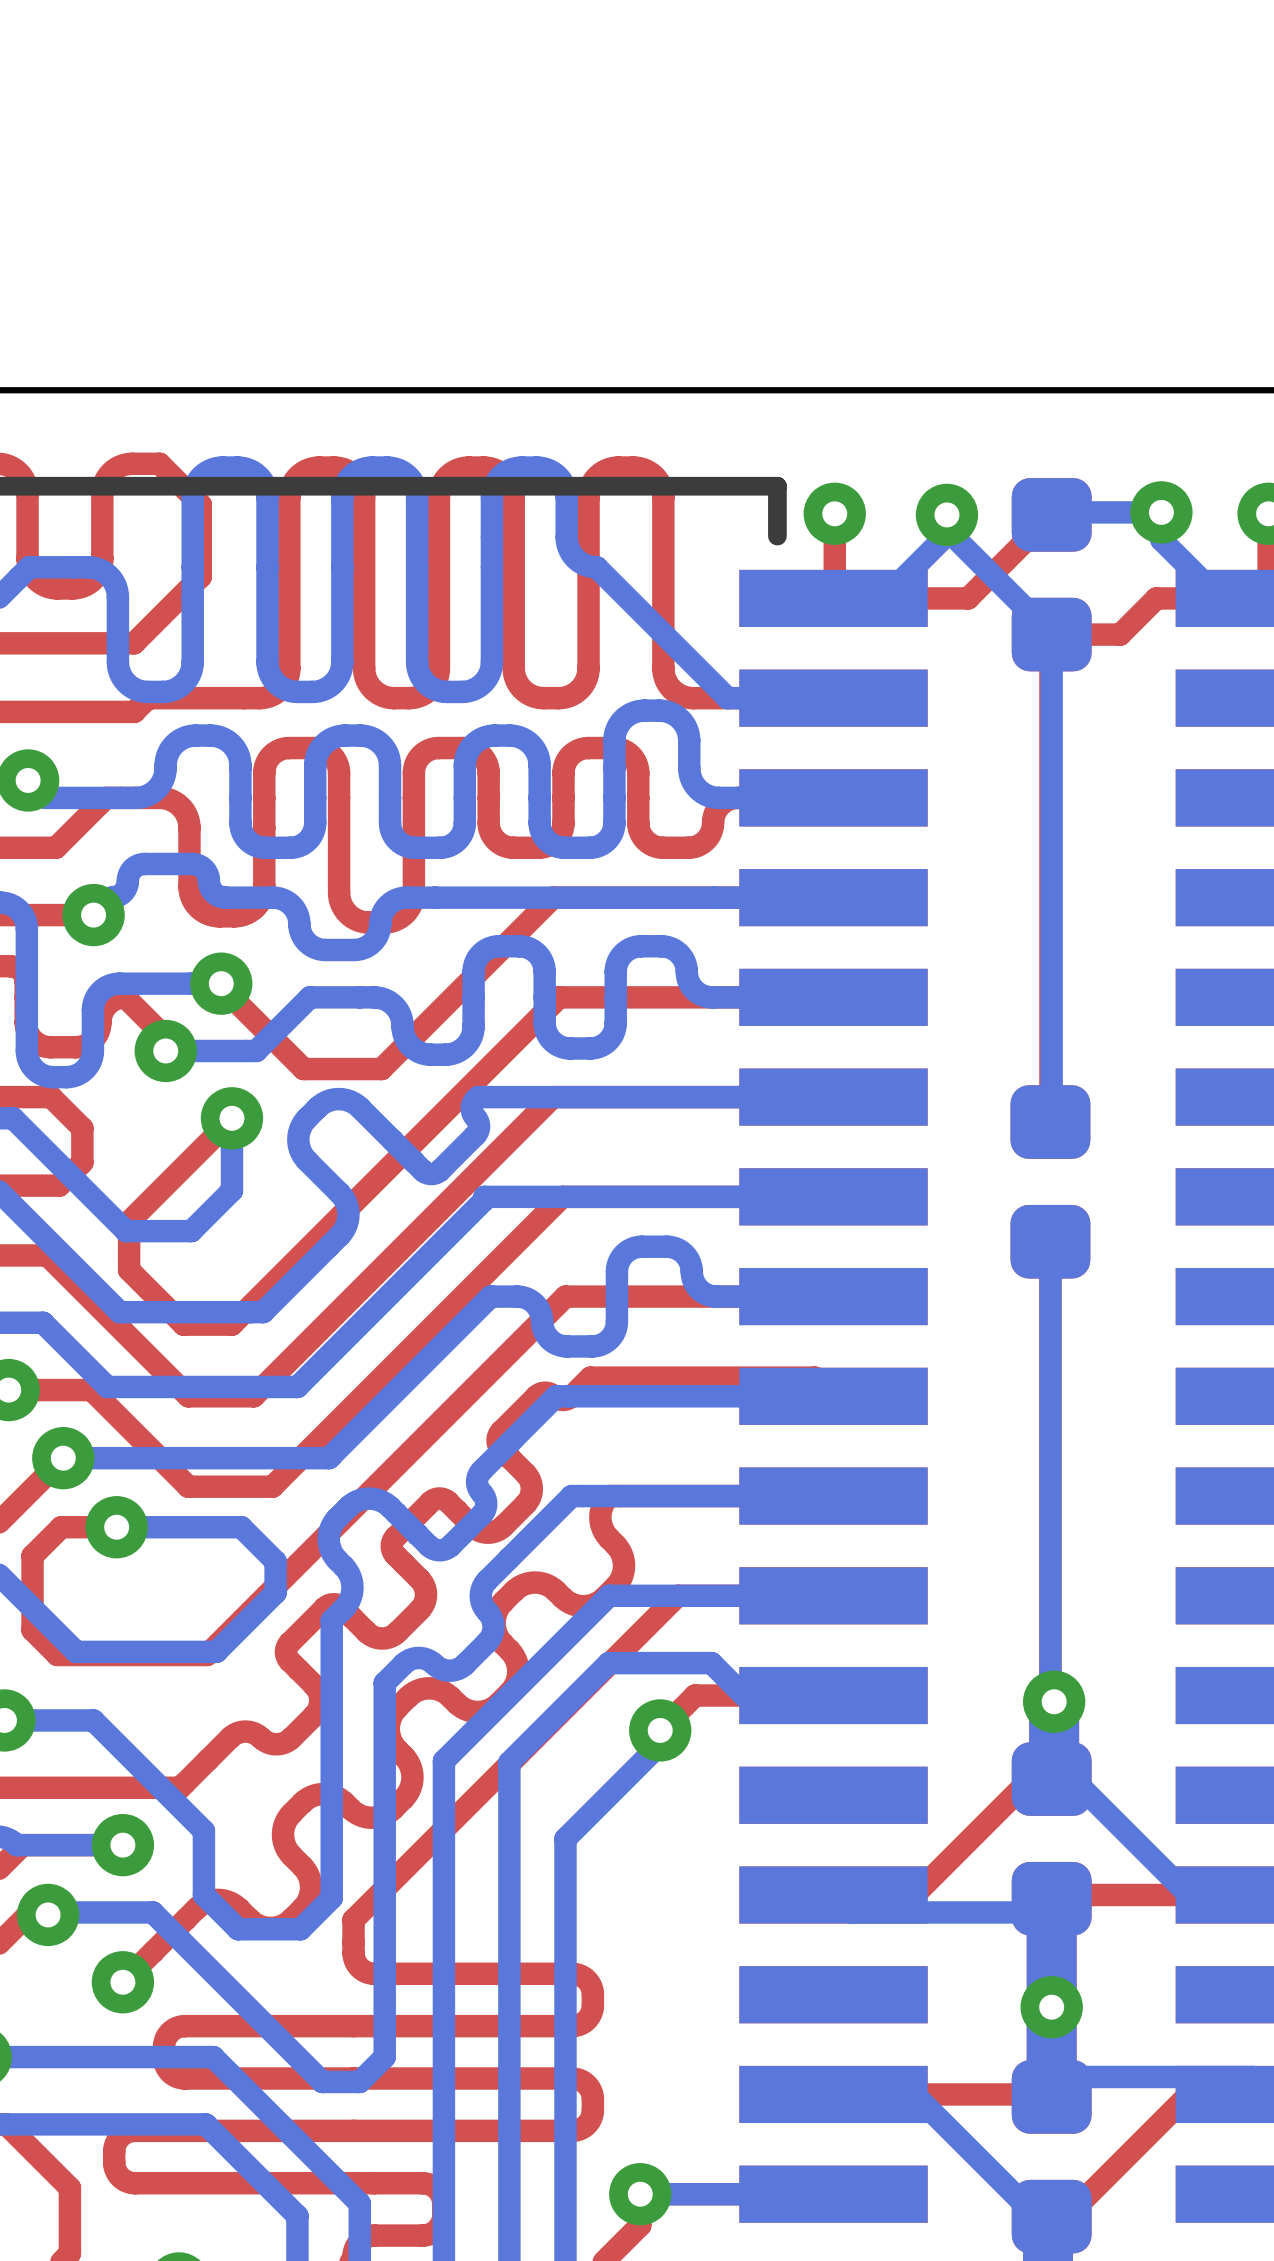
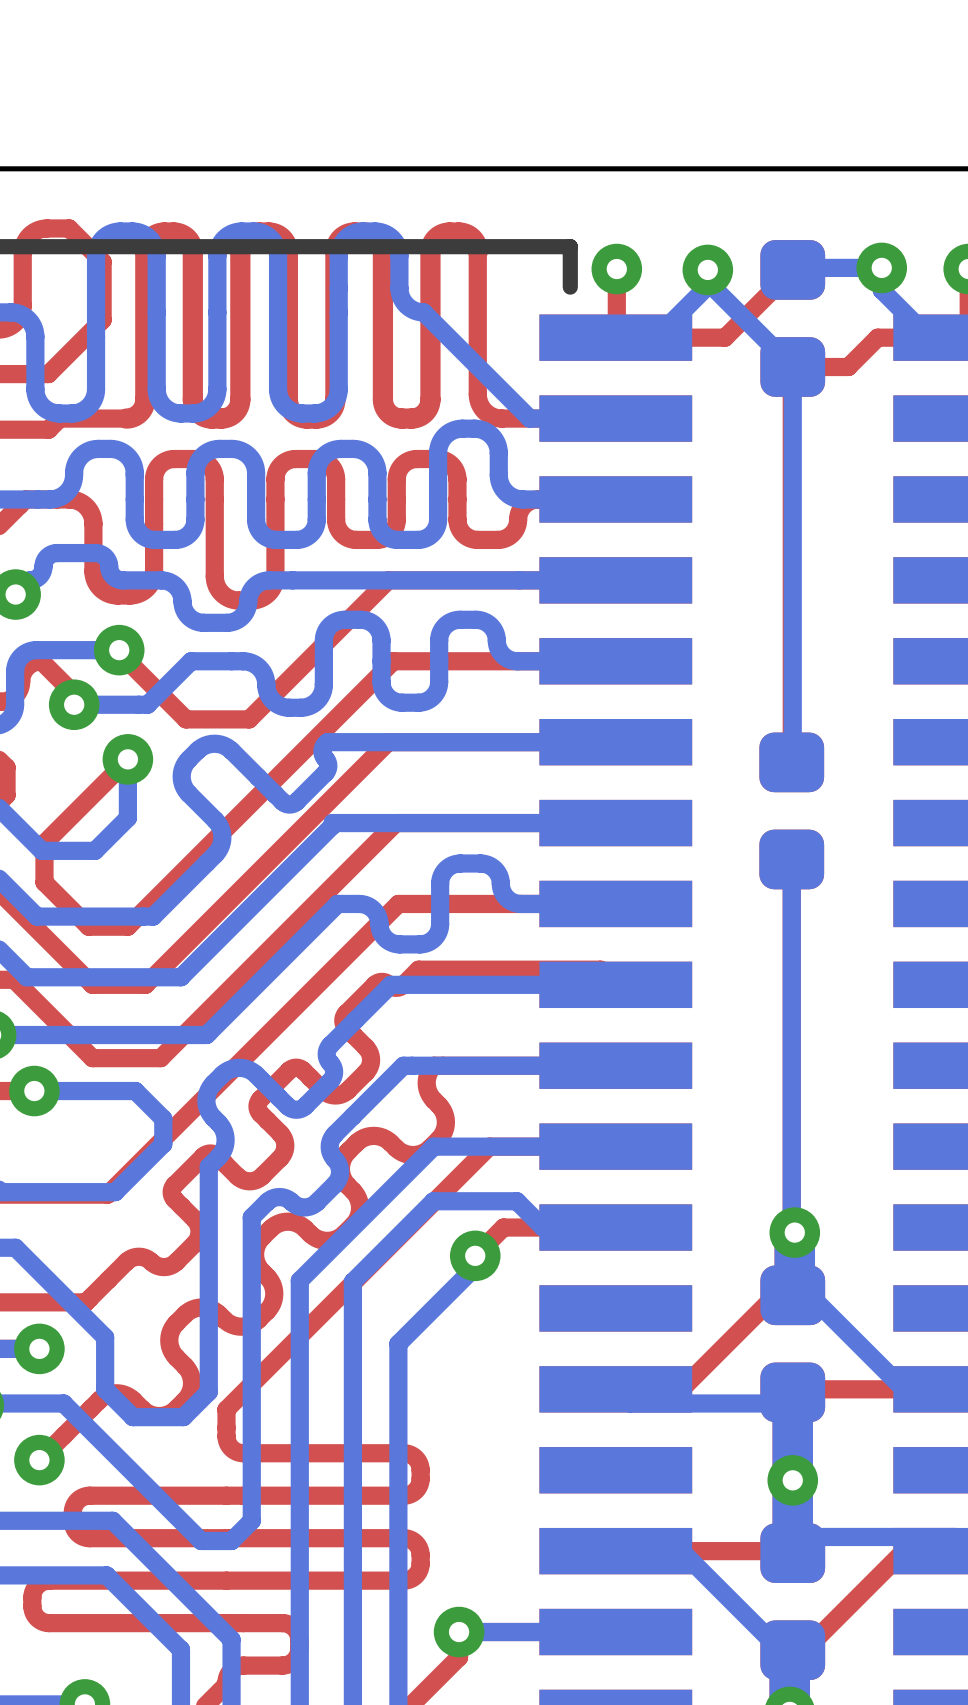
top track: (663, 497) (661, 487) (656, 478) (649, 472) (640, 468) (611, 468) (602, 472) (593, 481) (588, 497) (587, 674) (582, 686) (571, 695) (561, 697) (540, 697) (530, 695) (522, 689) (516, 681) (513, 671) (513, 497) (512, 487) (504, 476) (490, 468) (465, 467) (450, 474) (443, 481) (439, 494) (438, 674) (432, 686) (422, 695) (412, 697) (390, 697) (381, 695) (372, 689) (367, 681) (364, 671) (364, 497) (362, 487) (355, 476) (344, 469) (319, 467) (306, 470) (293, 481) (289, 494) (289, 668) (287, 678) (280, 689) (269, 696) (229, 698) -> (477, 251) (472, 238) (461, 232) (442, 233) (431, 244) (430, 402) (426, 411) (420, 416) (413, 418) (399, 418) (388, 413) (383, 402) (382, 246) (377, 238) (368, 233) (351, 232) (340, 238) (335, 251) (334, 404) (329, 413) (323, 417) (304, 418) (293, 413) (288, 402) (287, 246) (282, 238) (273, 233) (256, 232) (249, 235) (242, 242) (240, 251) (239, 404) (230, 416) (211, 418) (200, 414) (192, 402) (192, 246) (187, 238) (181, 233) (157, 233) (149, 239) (145, 249) (145, 402) (139, 413) (126, 418)

